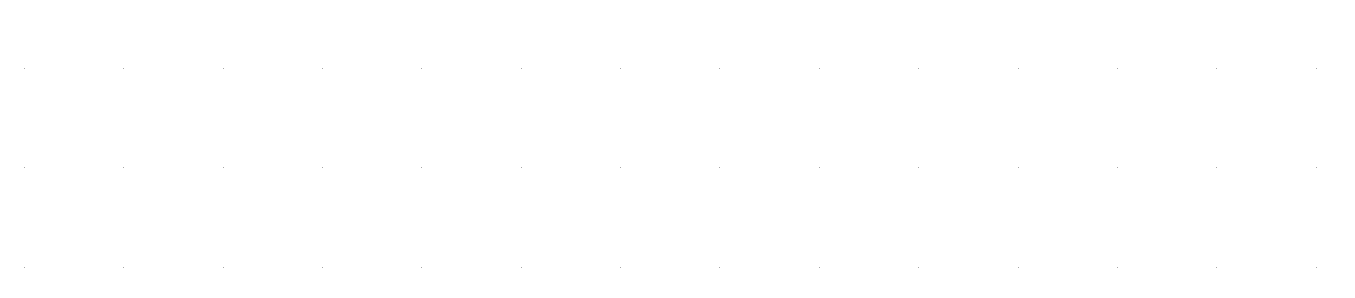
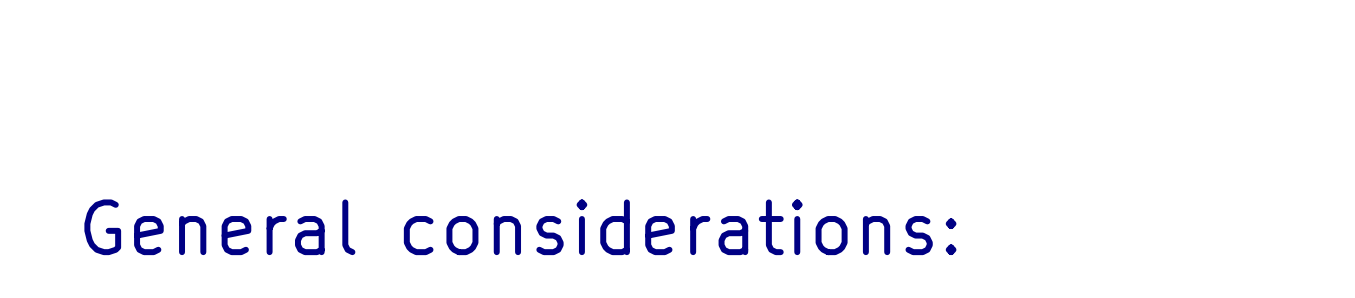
text: none -> General considerations: (520, 227)

